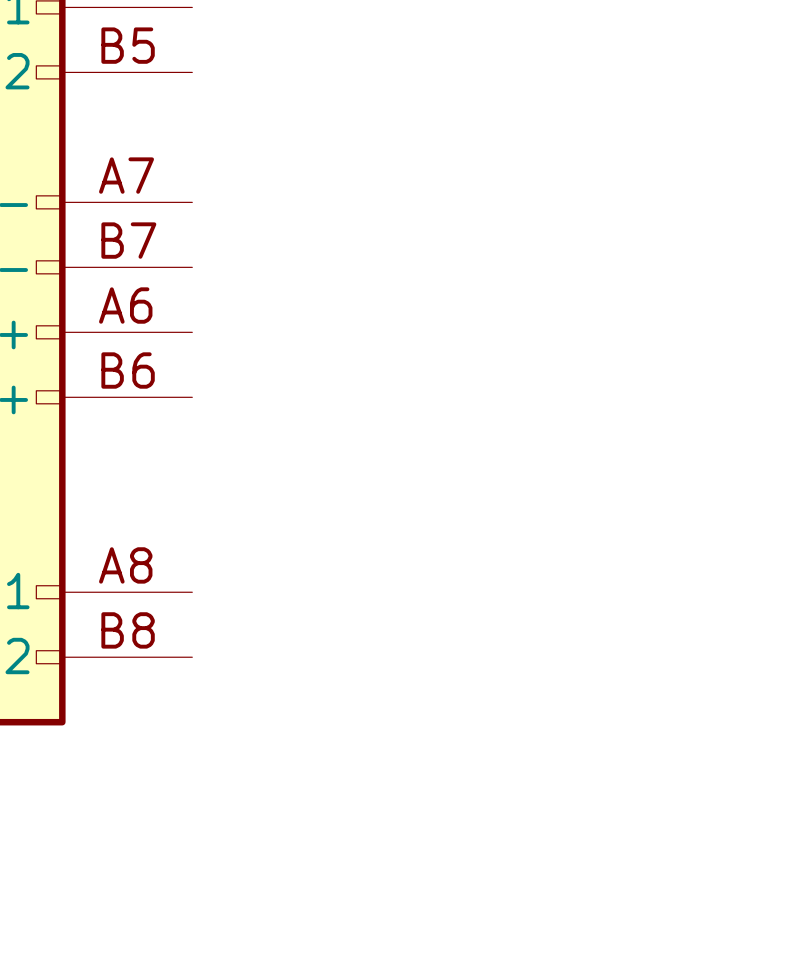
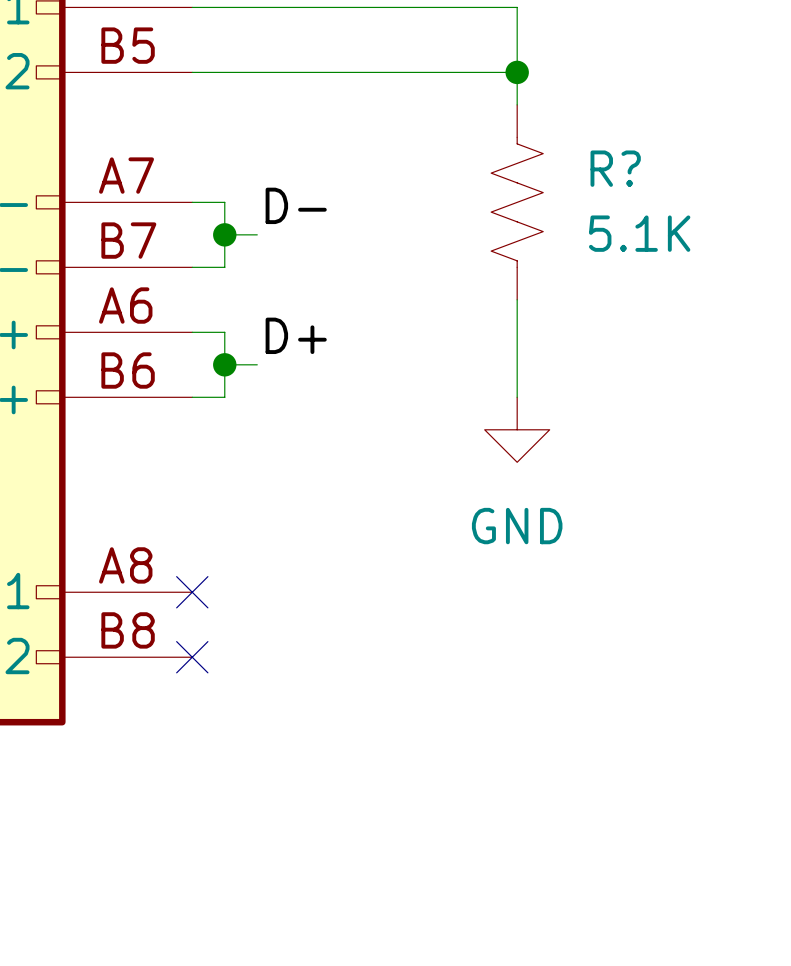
wire: none -> (192, 7) (517, 7) (517, 104)
wire: none -> (192, 72) (517, 72)
junction: none -> (517, 72)
wire: none -> (192, 202) (224, 202) (224, 267) (192, 267)
R?: none -> 5.1K (517, 202)
label: none -> D- (296, 205)
wire: none -> (224, 234) (257, 234)
junction: none -> (224, 234)
wire: none -> (517, 299) (517, 397)
wire: none -> (192, 332) (224, 332) (224, 397) (192, 397)
label: none -> D+ (296, 335)
wire: none -> (224, 364) (257, 364)
junction: none -> (224, 364)
power symbol: none -> GND (517, 429)
no-connect mark: none -> (192, 592)
no-connect mark: none -> (192, 657)

